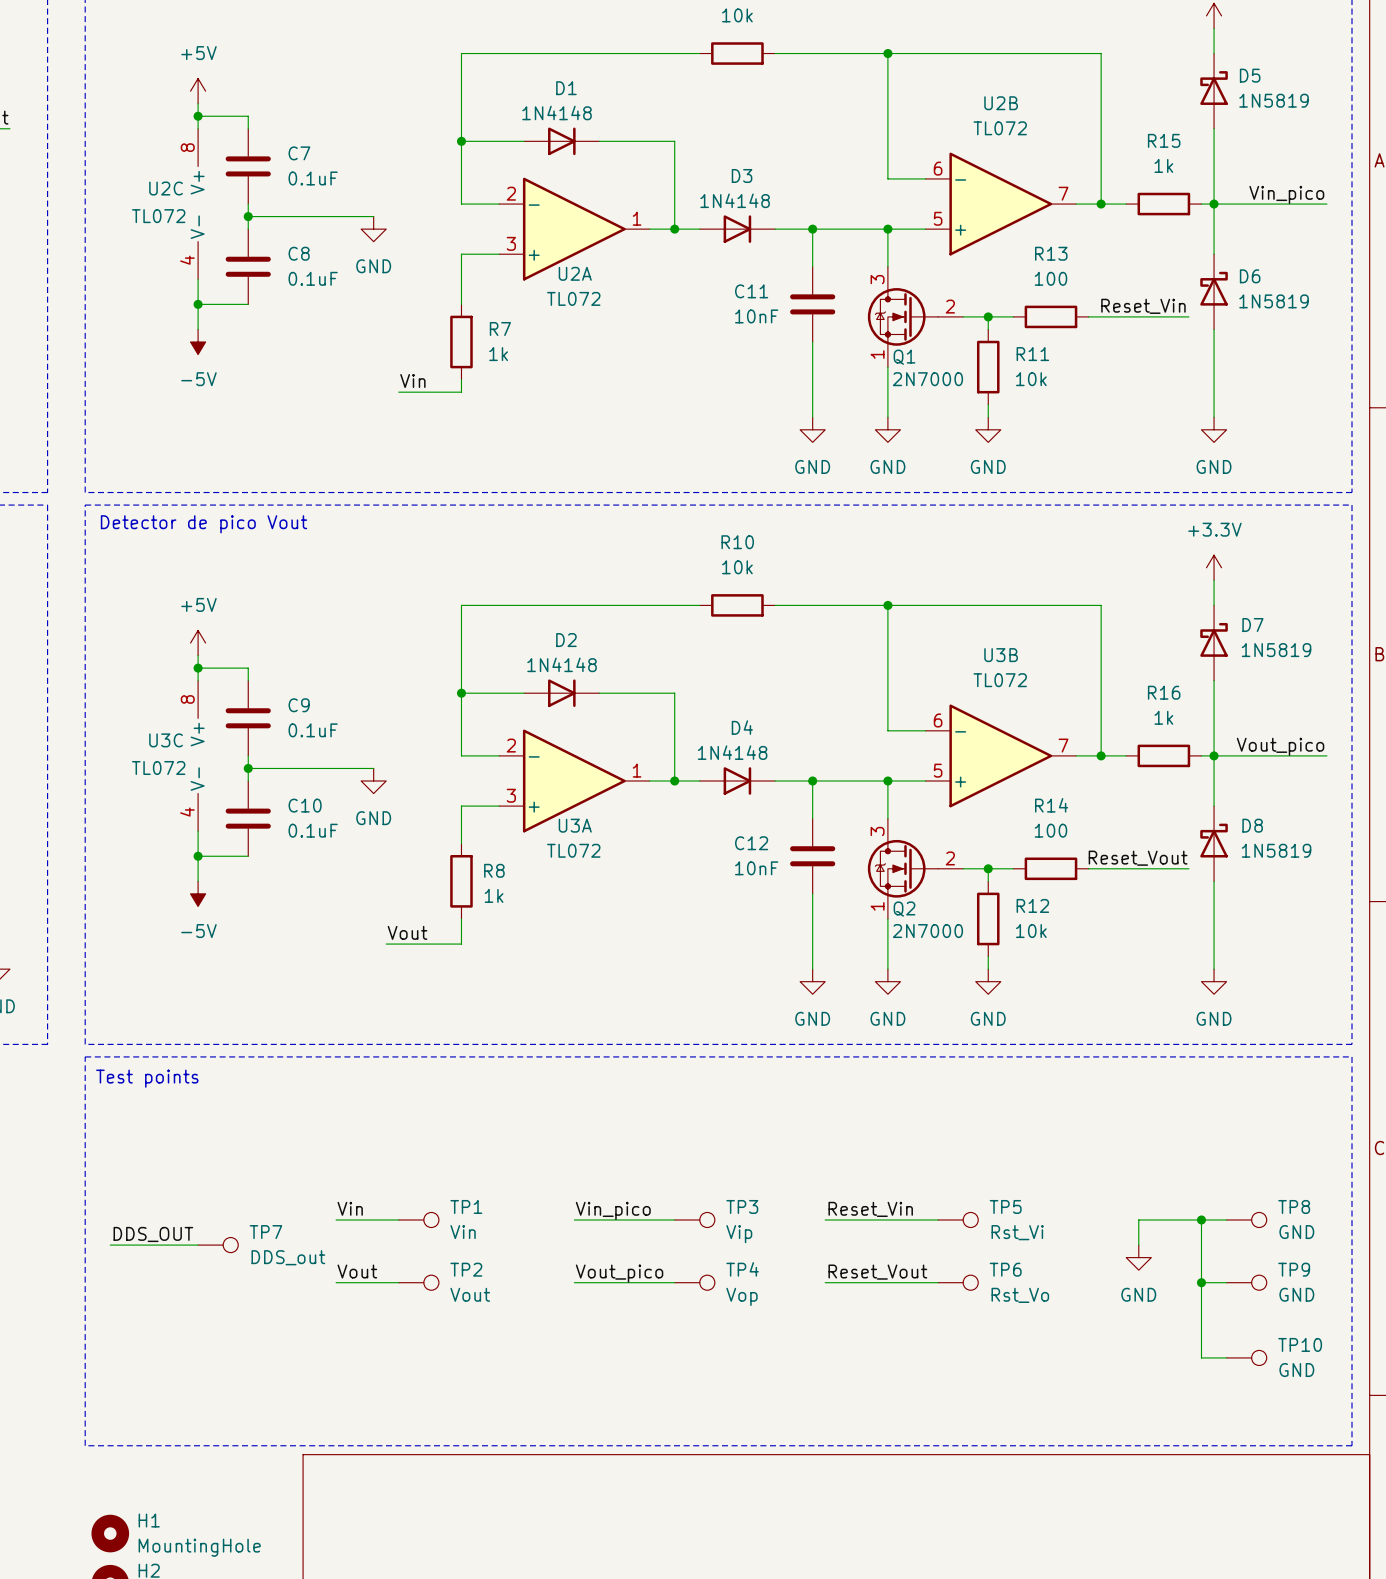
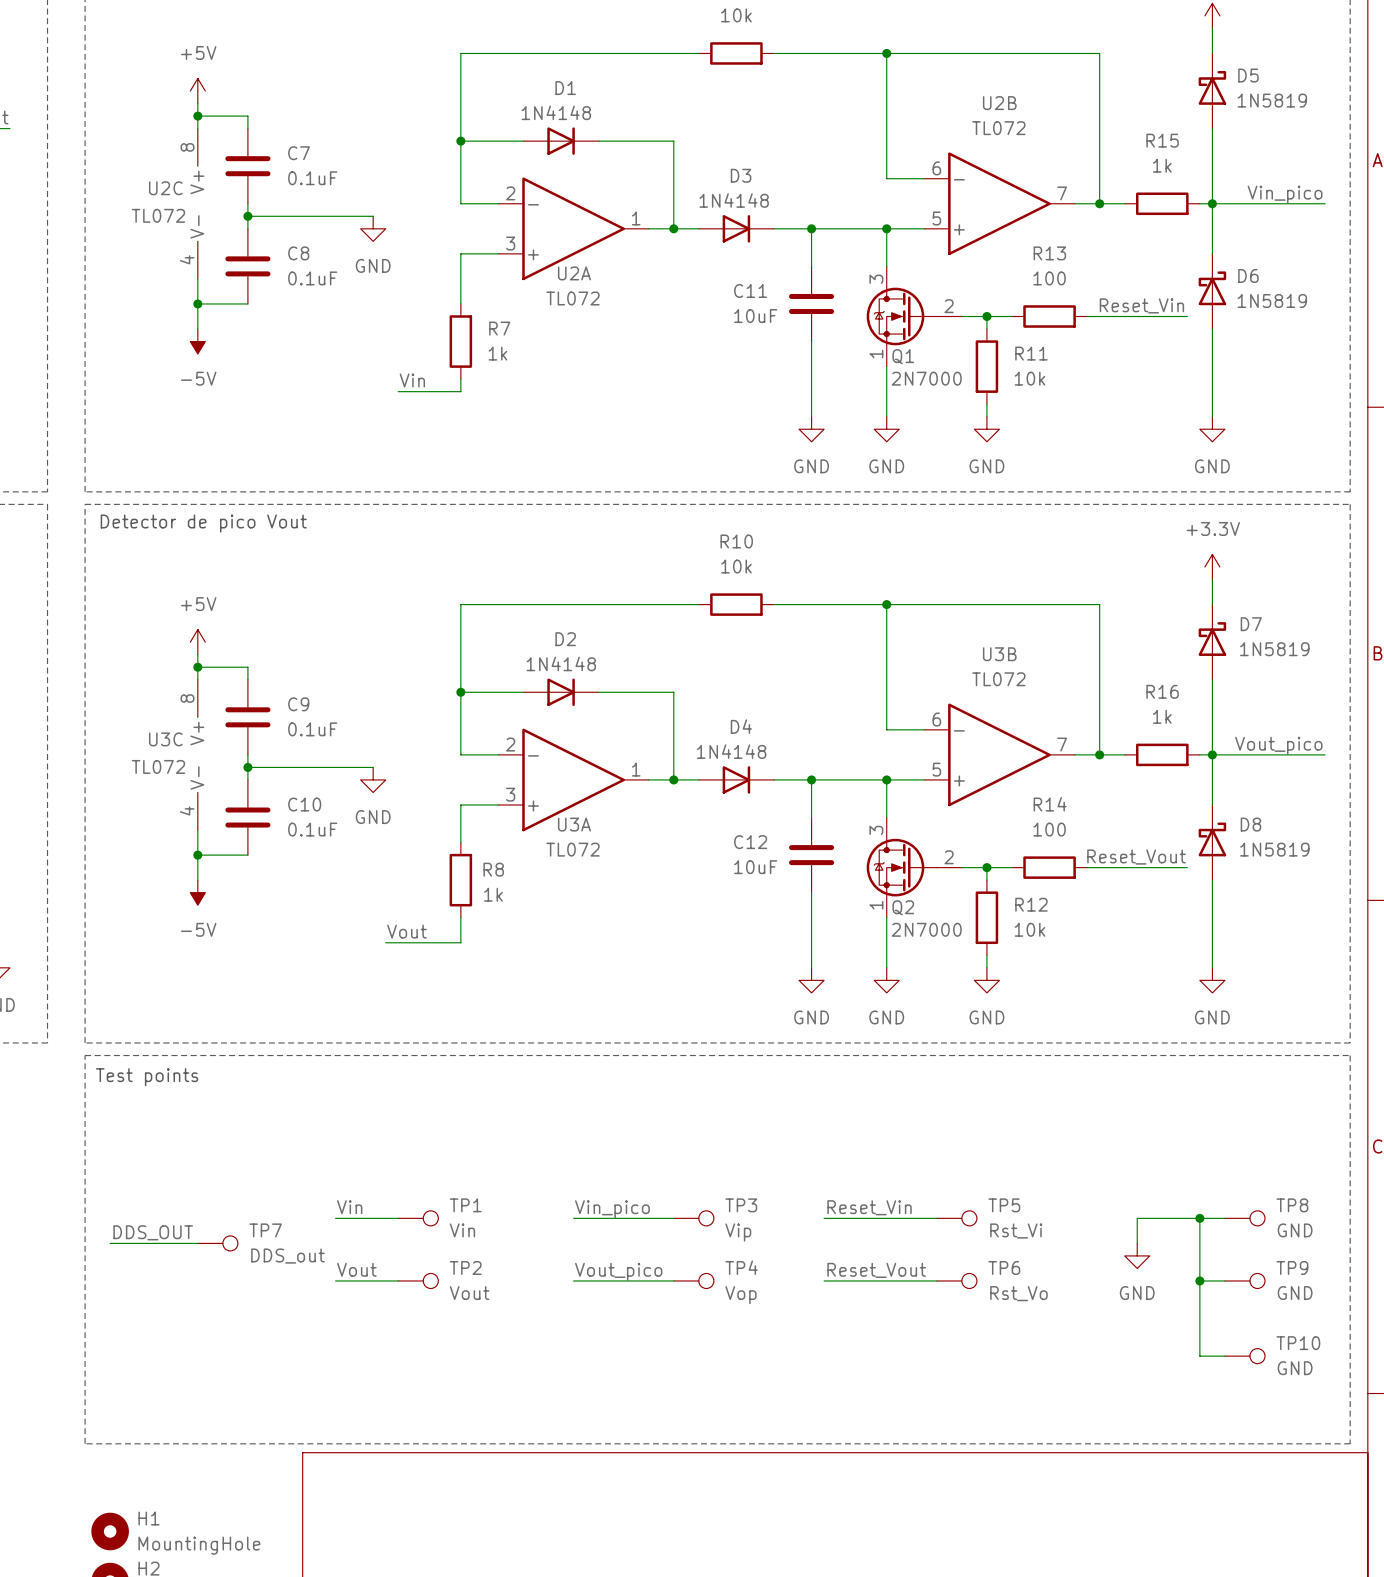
C11 value: 10nF (756, 316) -> 10uF (755, 316)
C12 value: 10nF (756, 868) -> 10uF (755, 867)

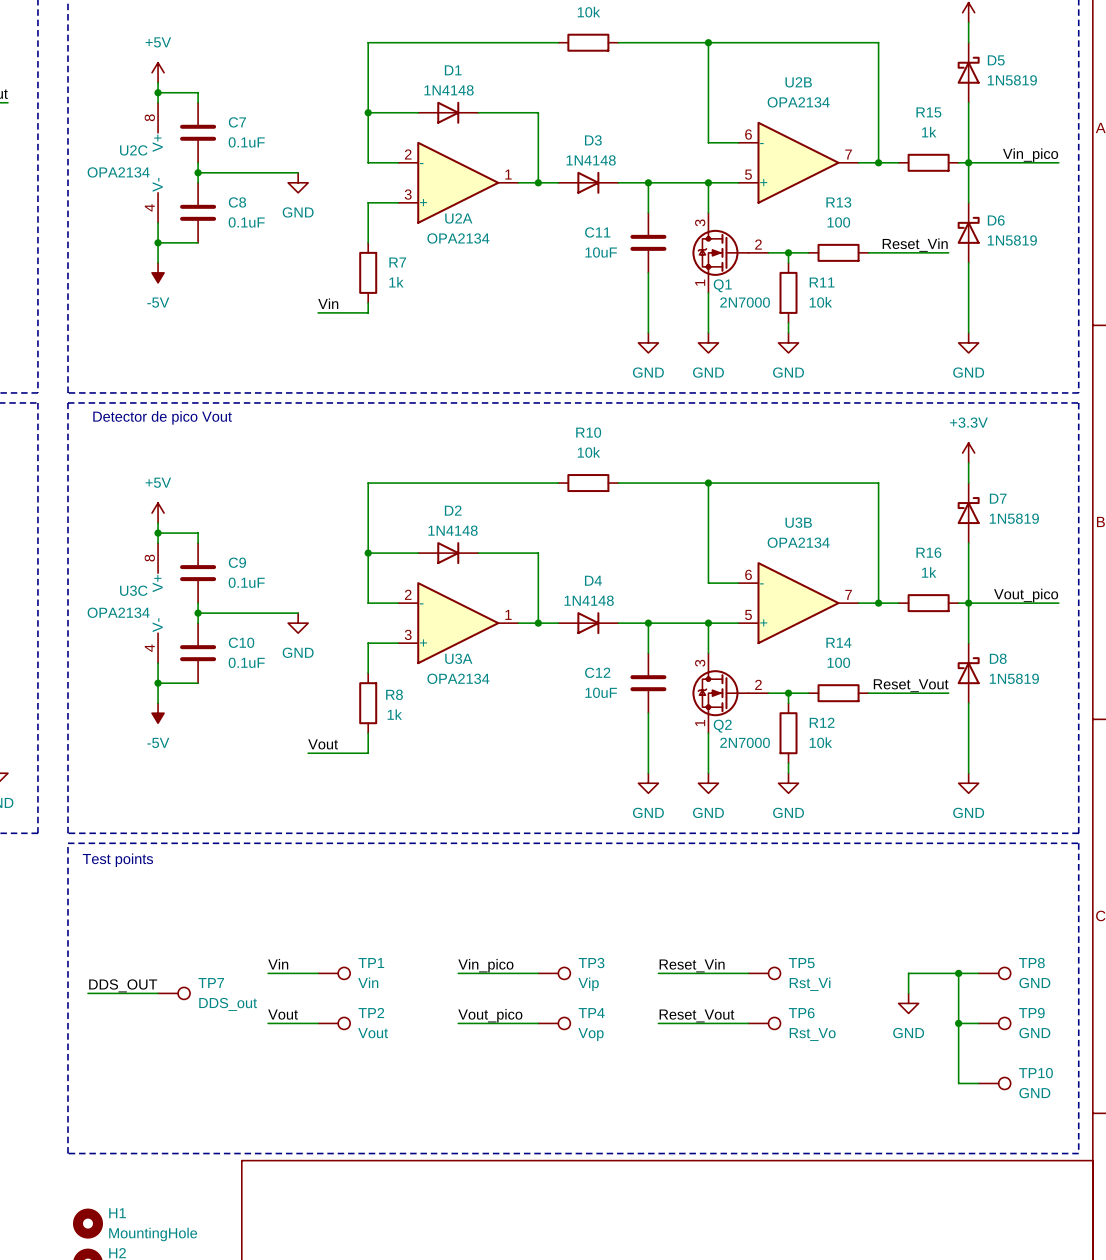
U2B value: TL072 (998, 128) -> OPA2134 (798, 102)
U2C value: TL072 (158, 215) -> OPA2134 (118, 172)
U2A value: TL072 (572, 298) -> OPA2134 (458, 238)
U3B value: TL072 (998, 679) -> OPA2134 (798, 542)
U3C value: TL072 (158, 766) -> OPA2134 (118, 612)
U3A value: TL072 (572, 849) -> OPA2134 (458, 678)

